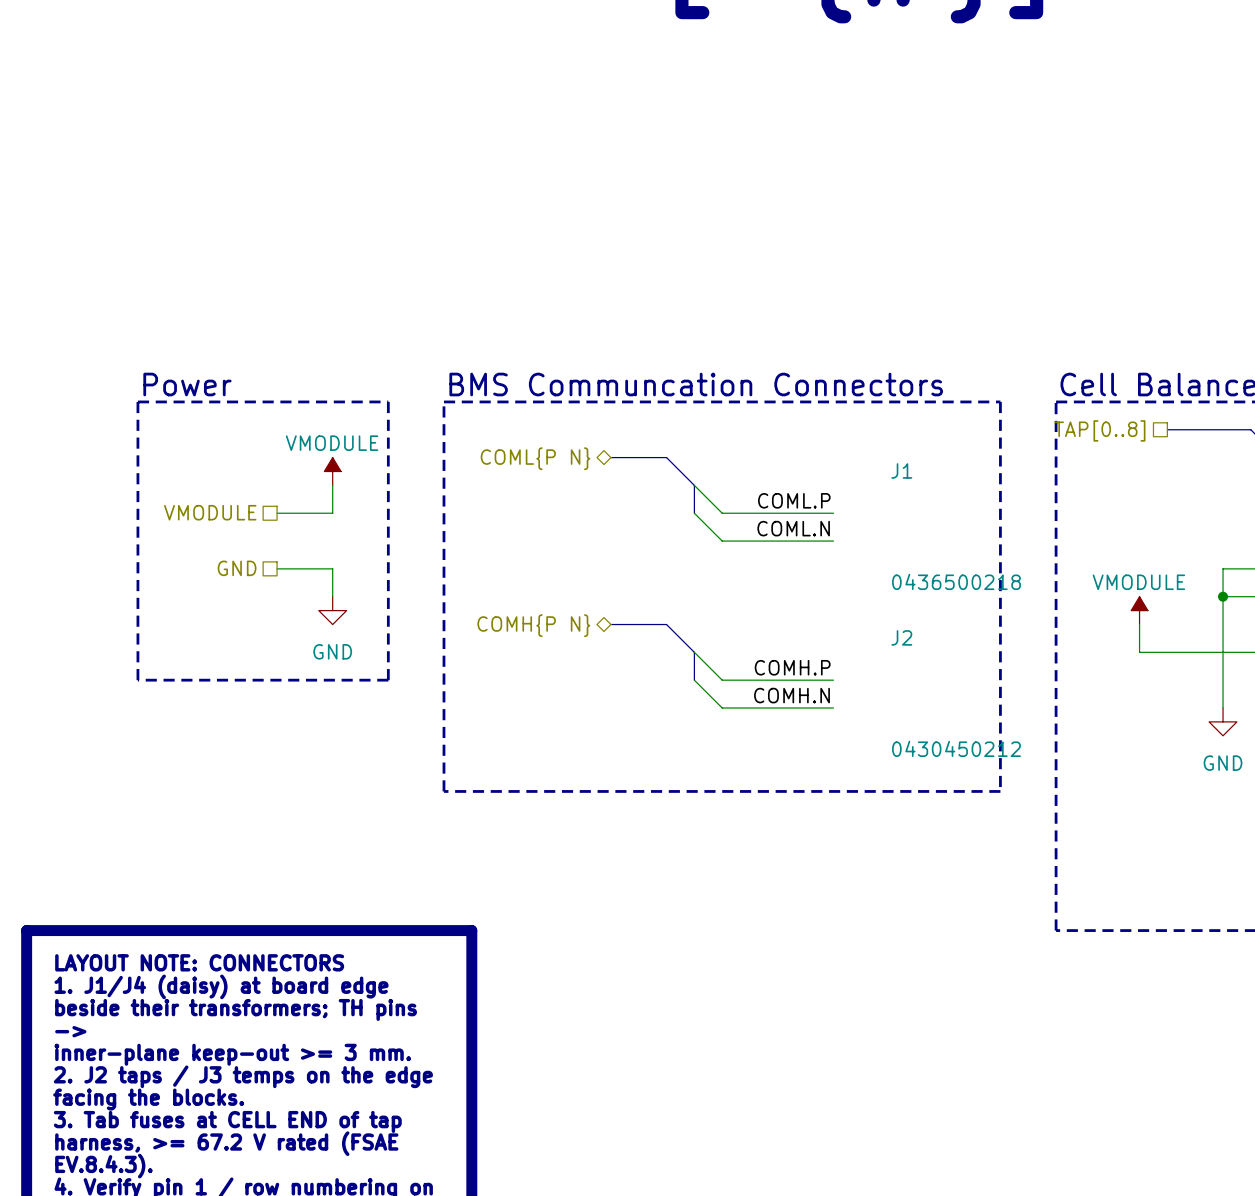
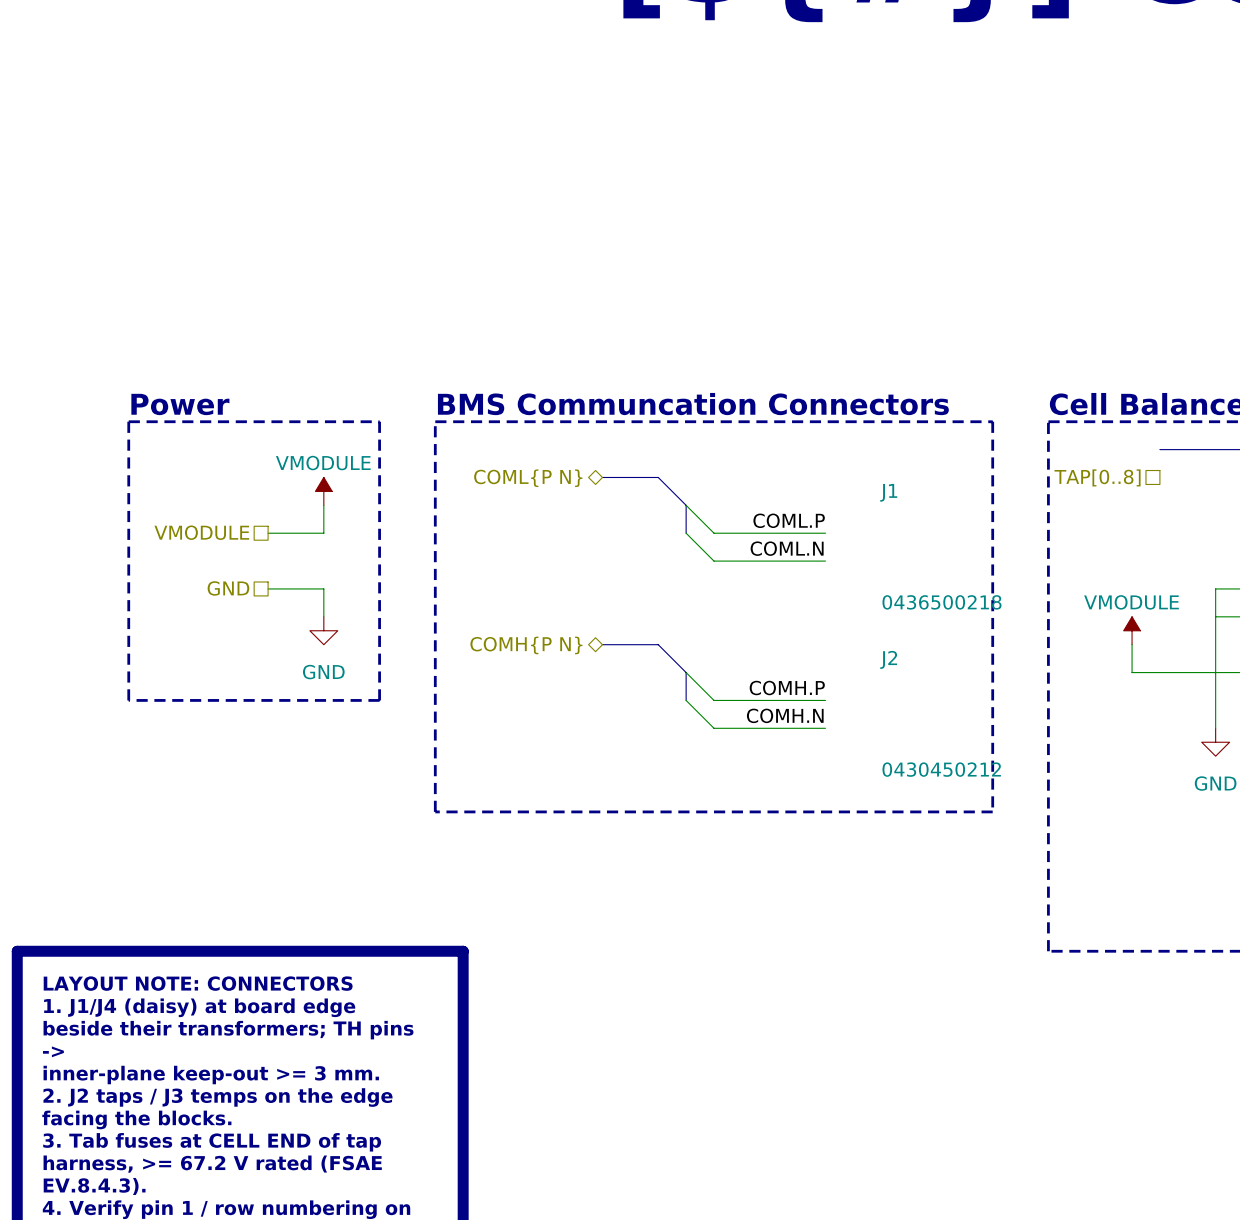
hierarchical label position: TAP[0..8] (1099, 430) -> TAP[0..8] (1097, 477)
junction: (1223, 596) -> none

